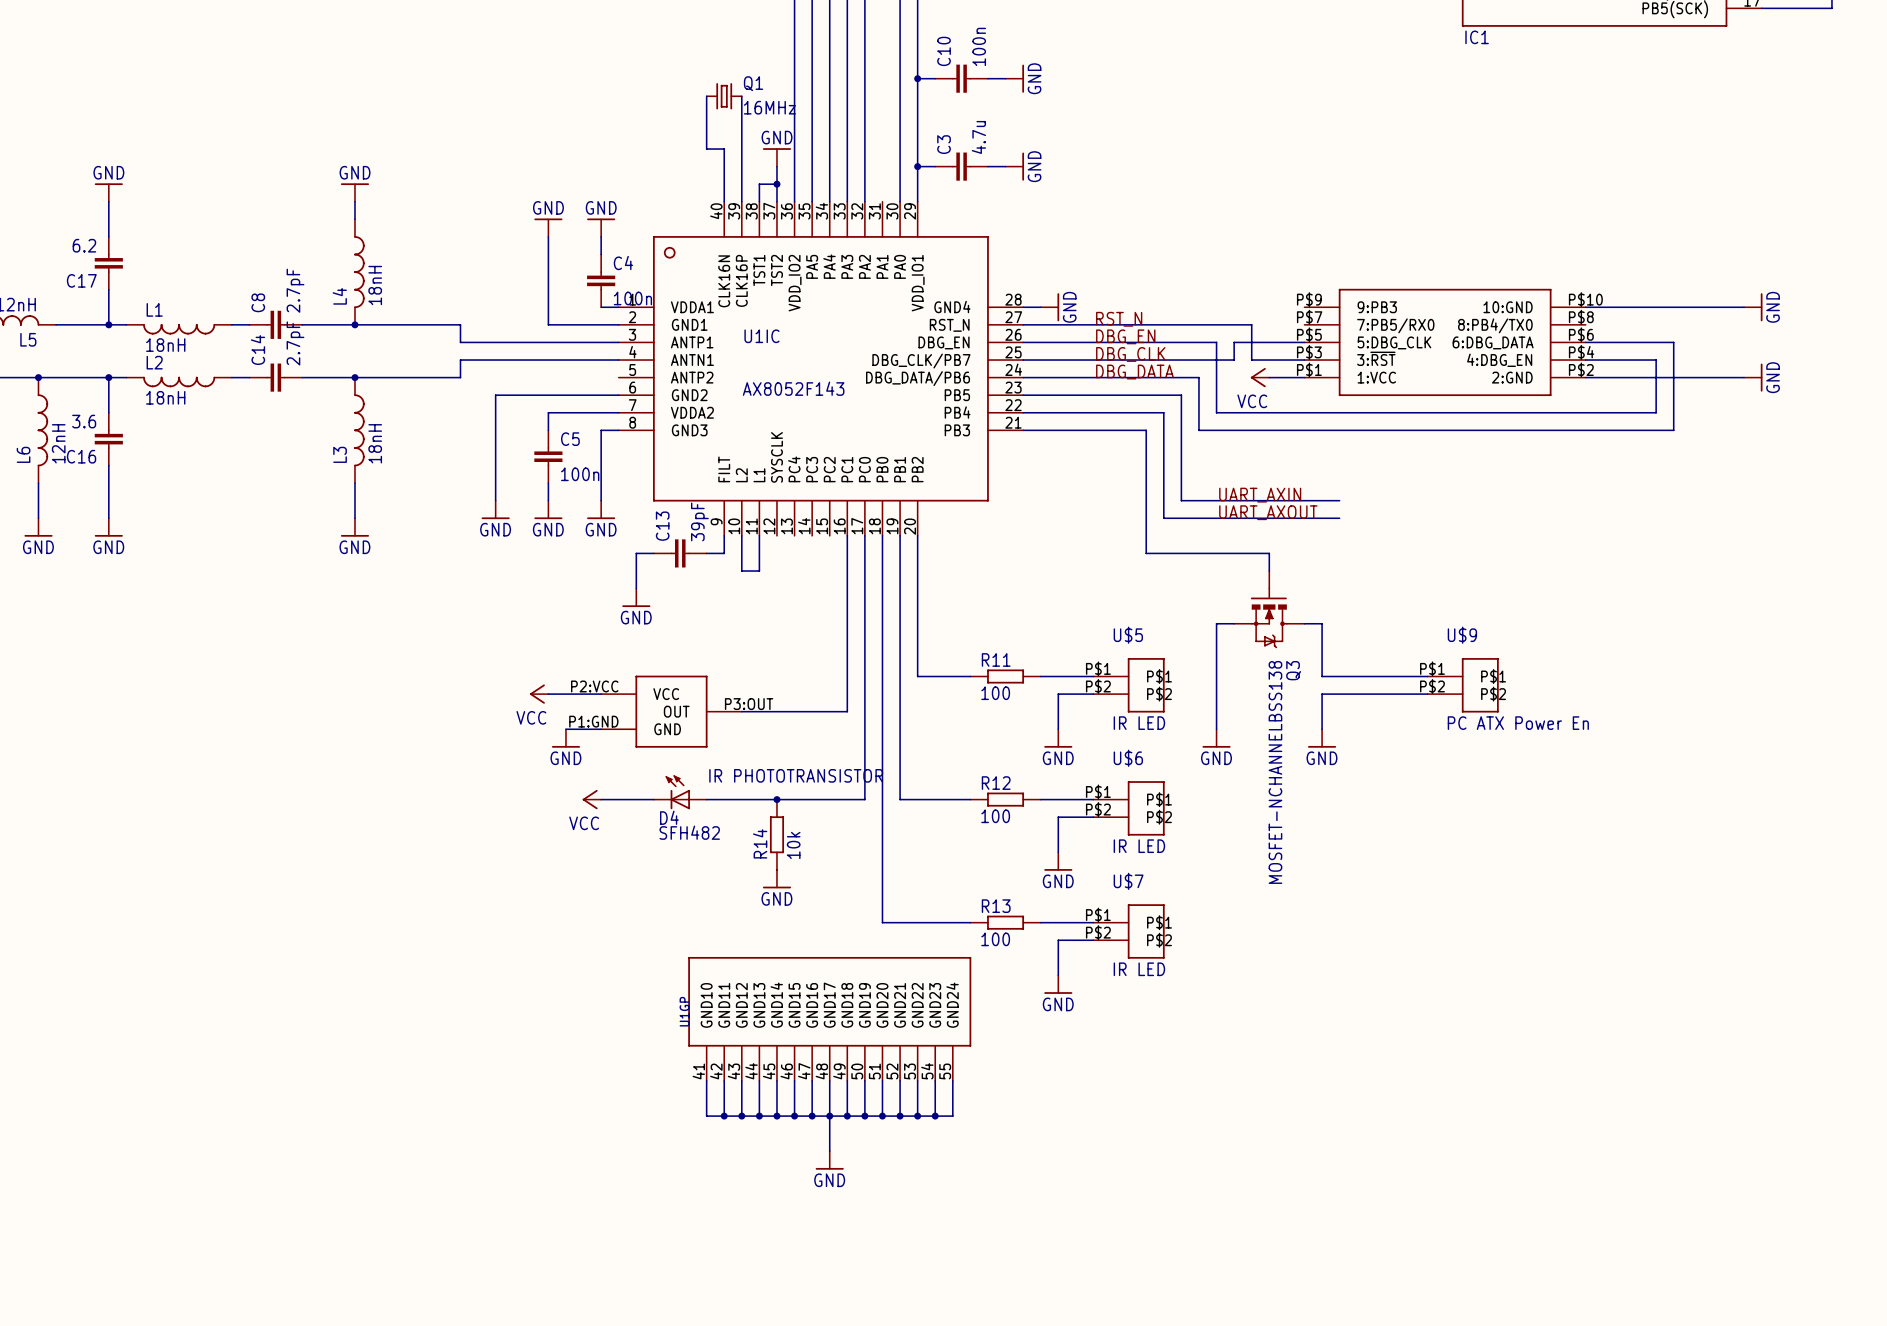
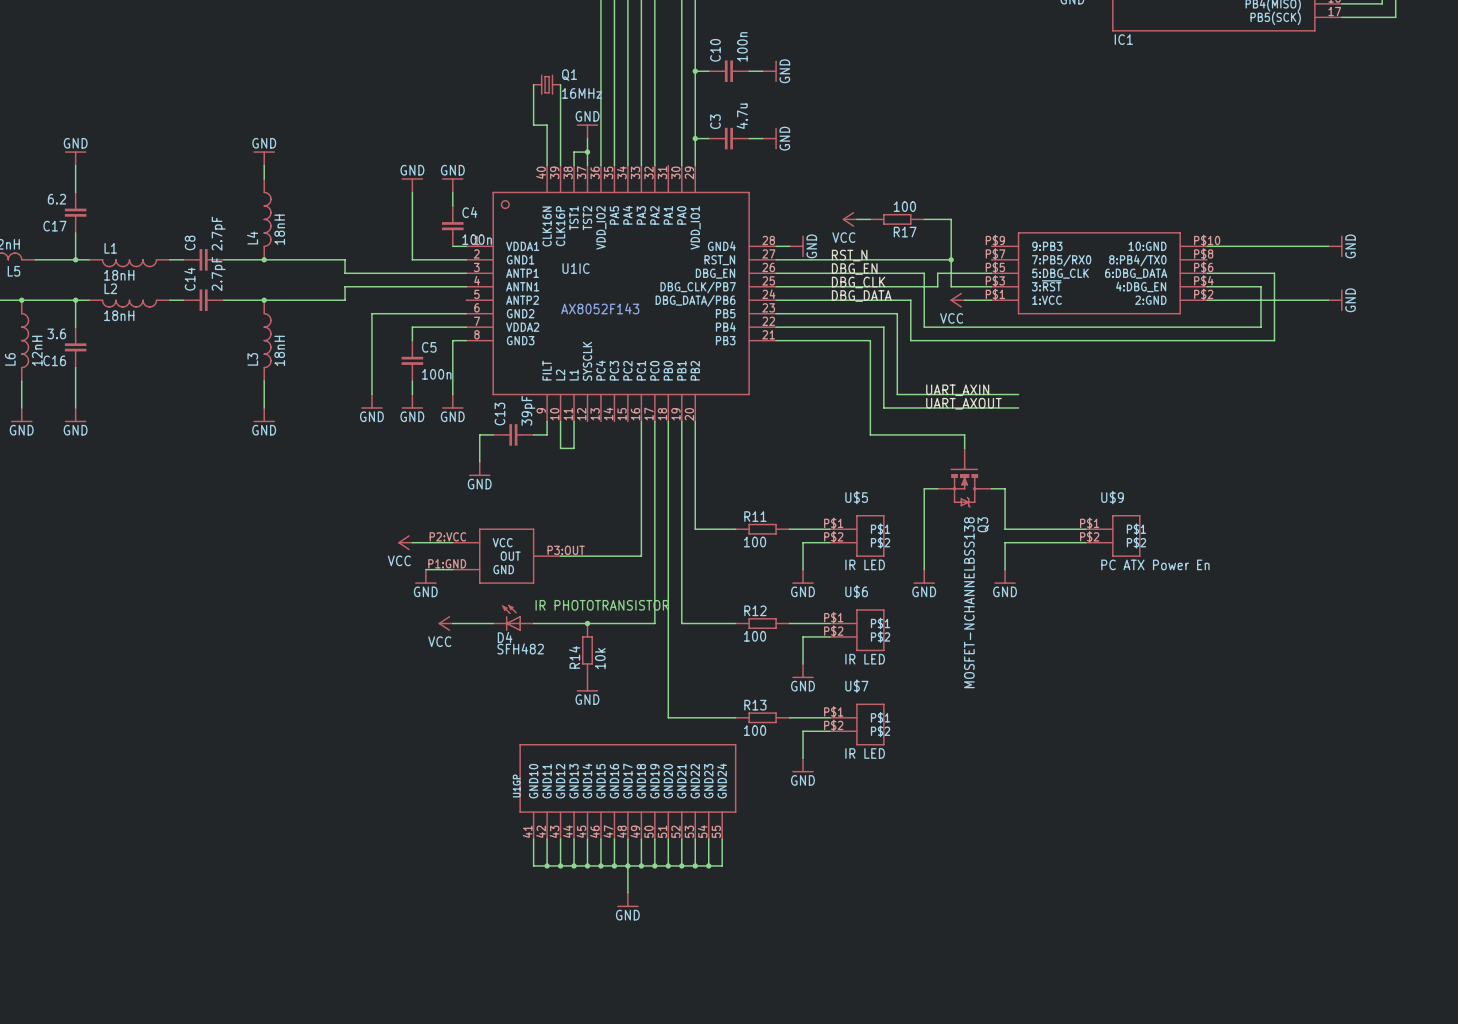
power symbol: none -> VCC (849, 219)
wire: none -> (856, 219) (870, 219)
R17: none -> 100 (897, 219)
wire: none -> (924, 219) (951, 219) (951, 259)
junction: none -> (951, 259)

